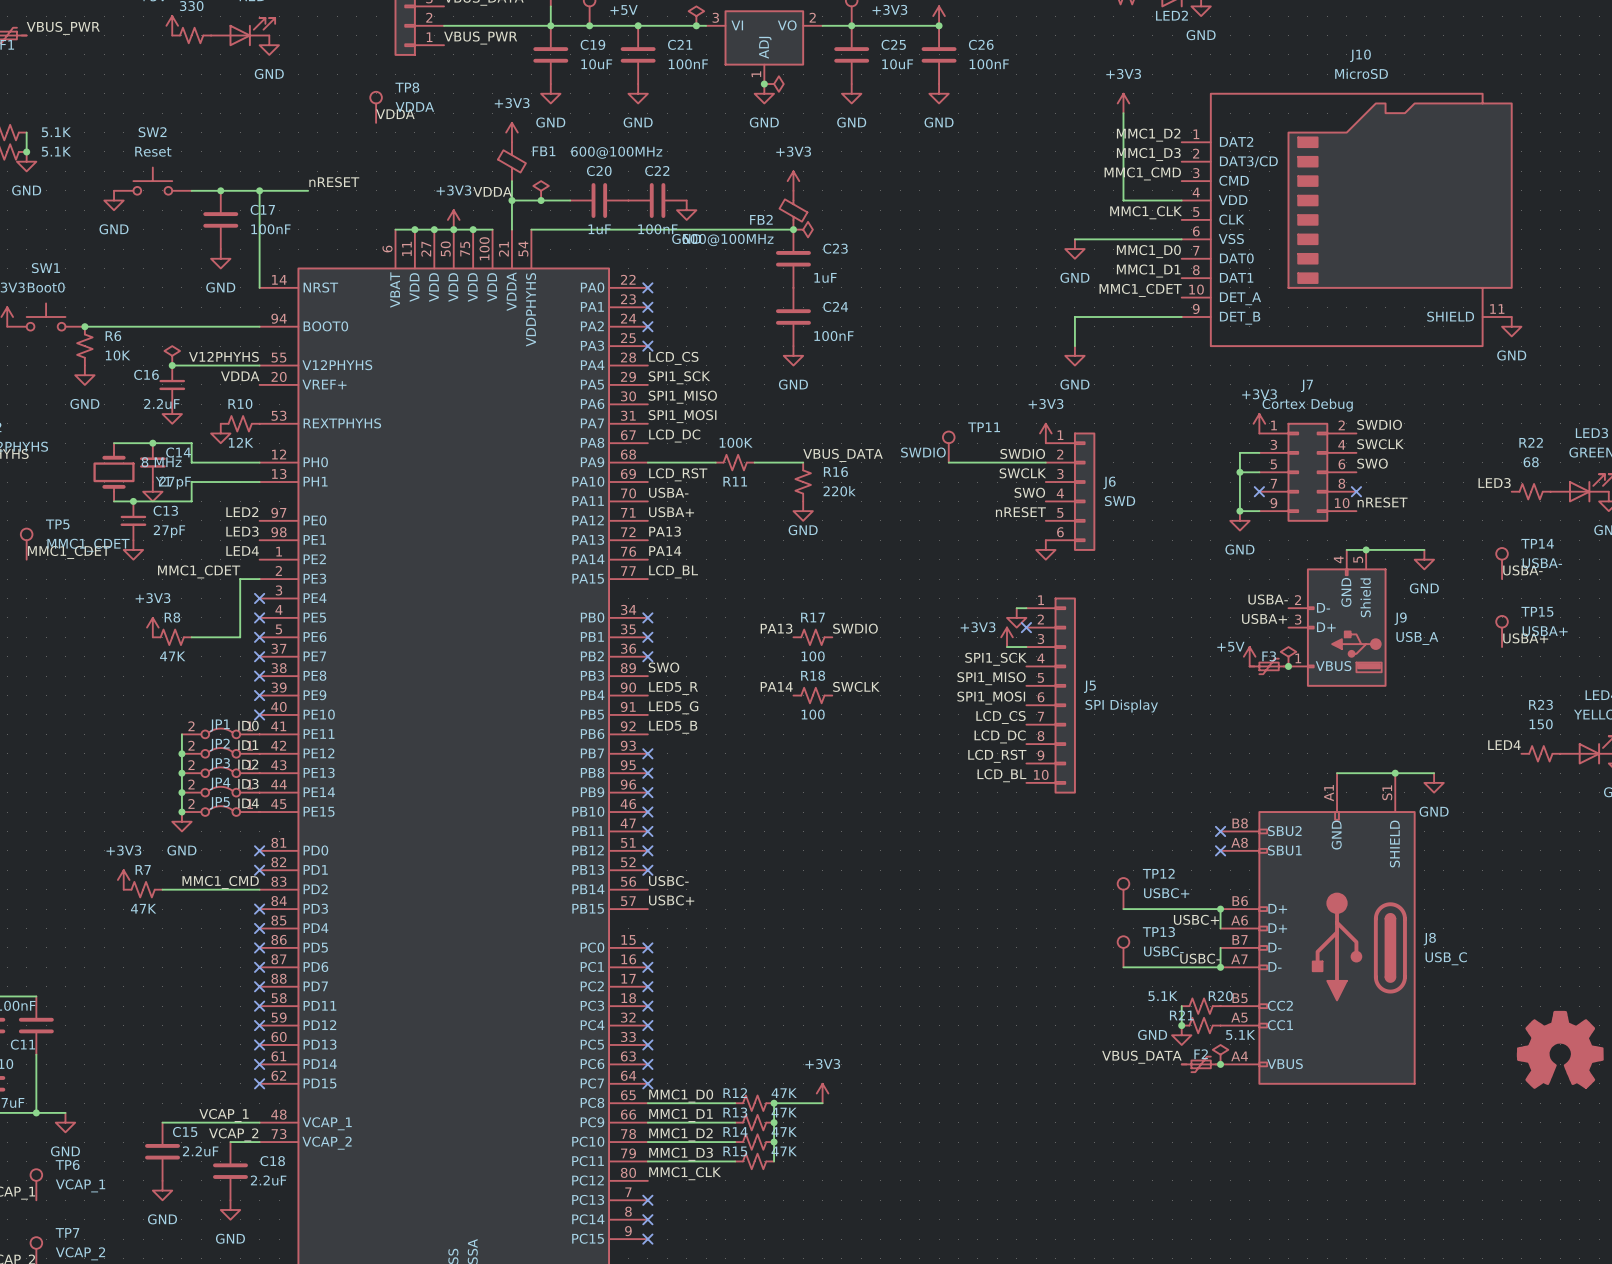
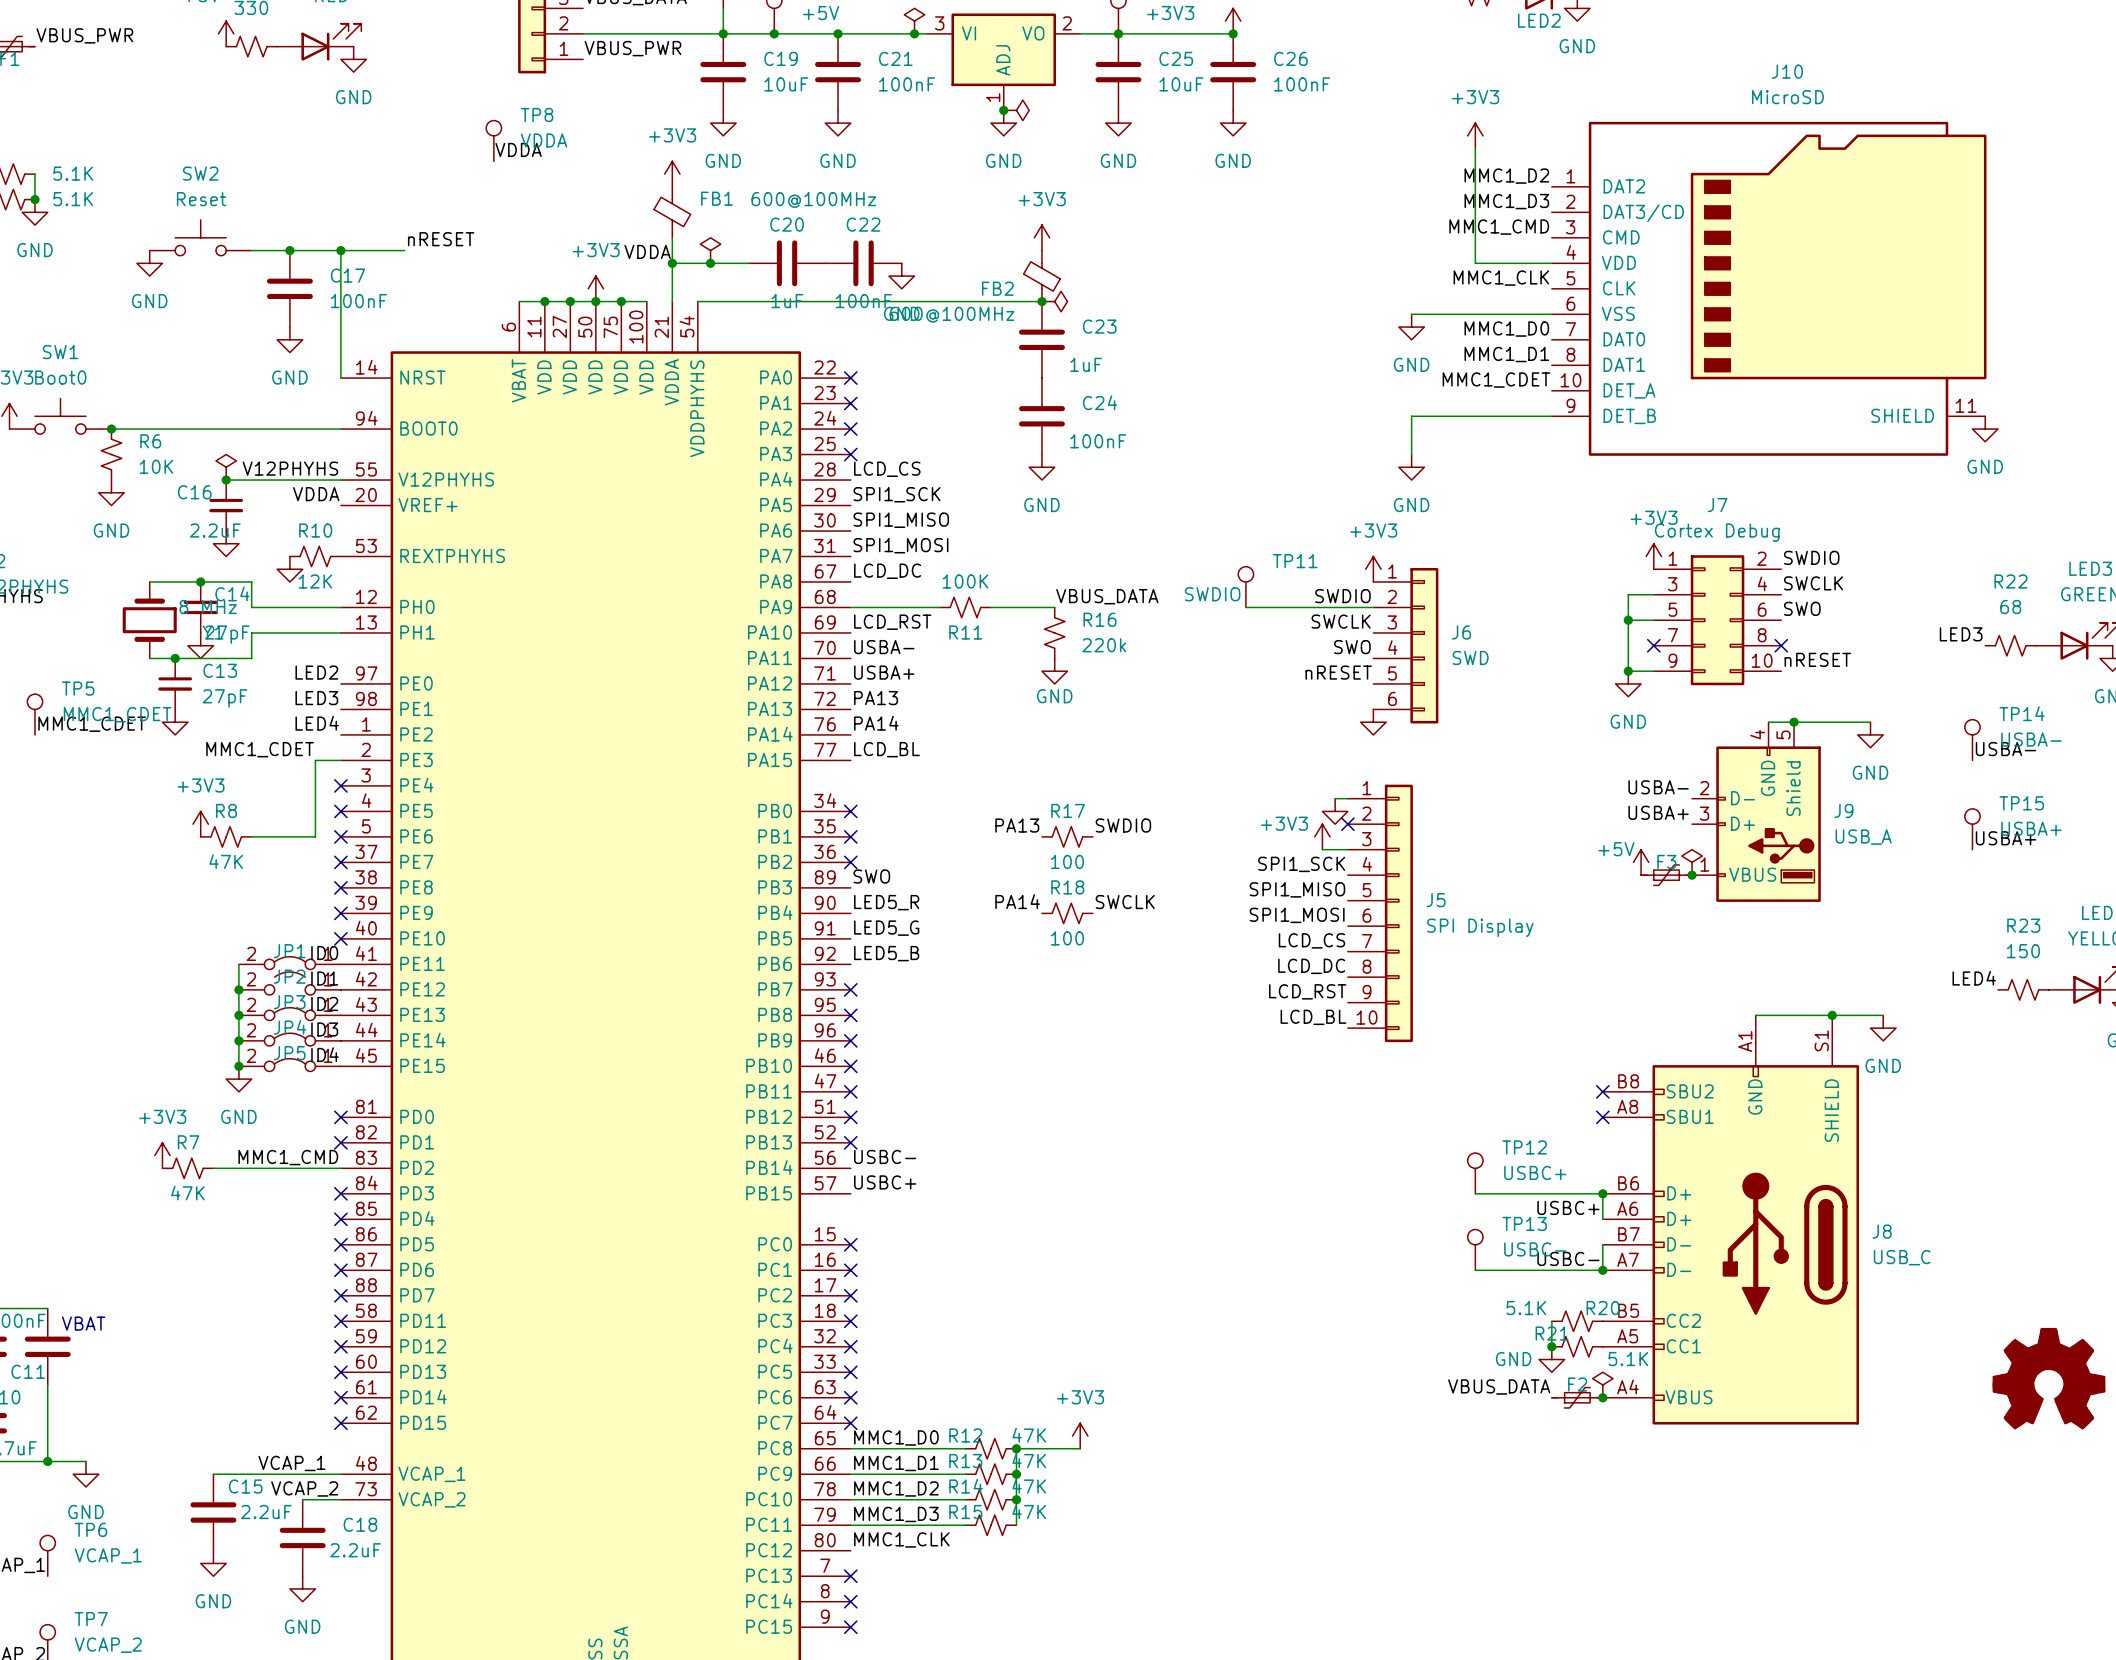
JP2 symbol: [181, 747, 260, 758] -> [238, 972, 341, 995]
text: none -> VBAT (83, 1323)

